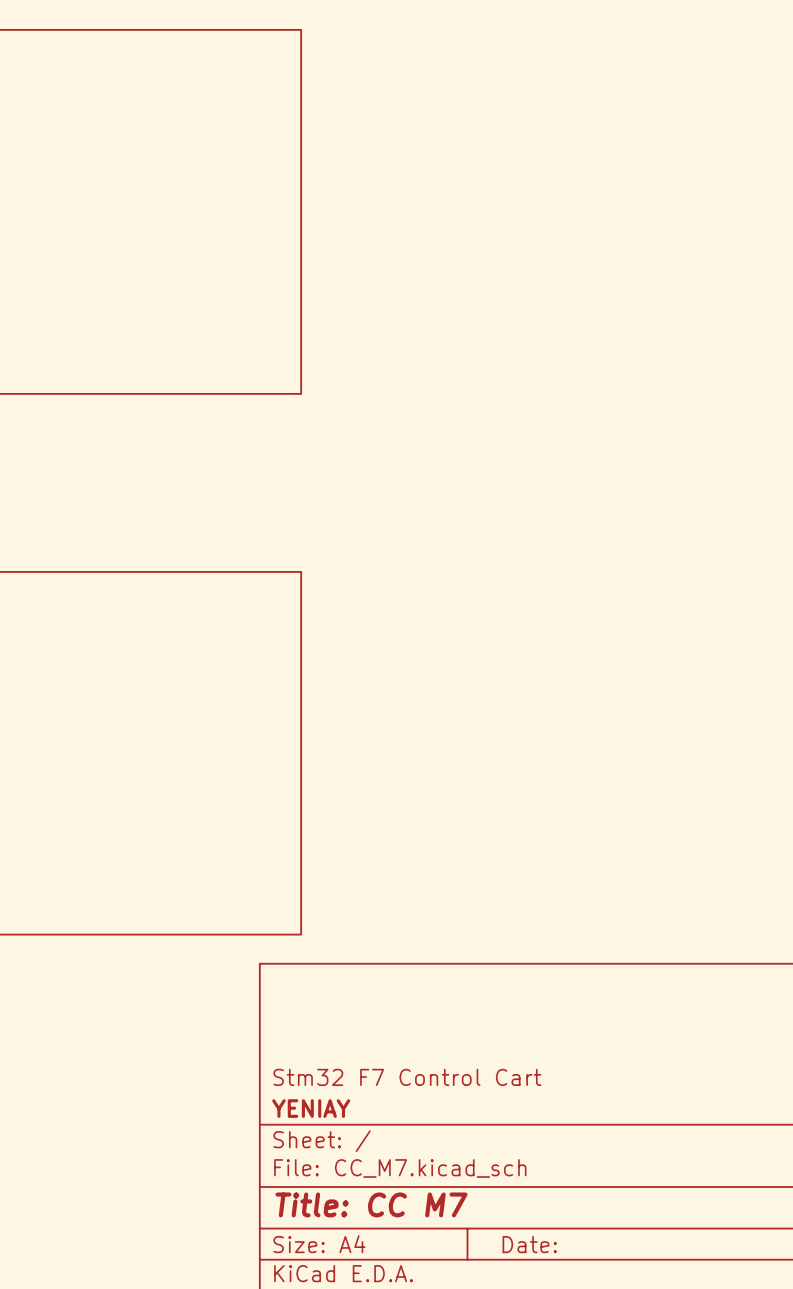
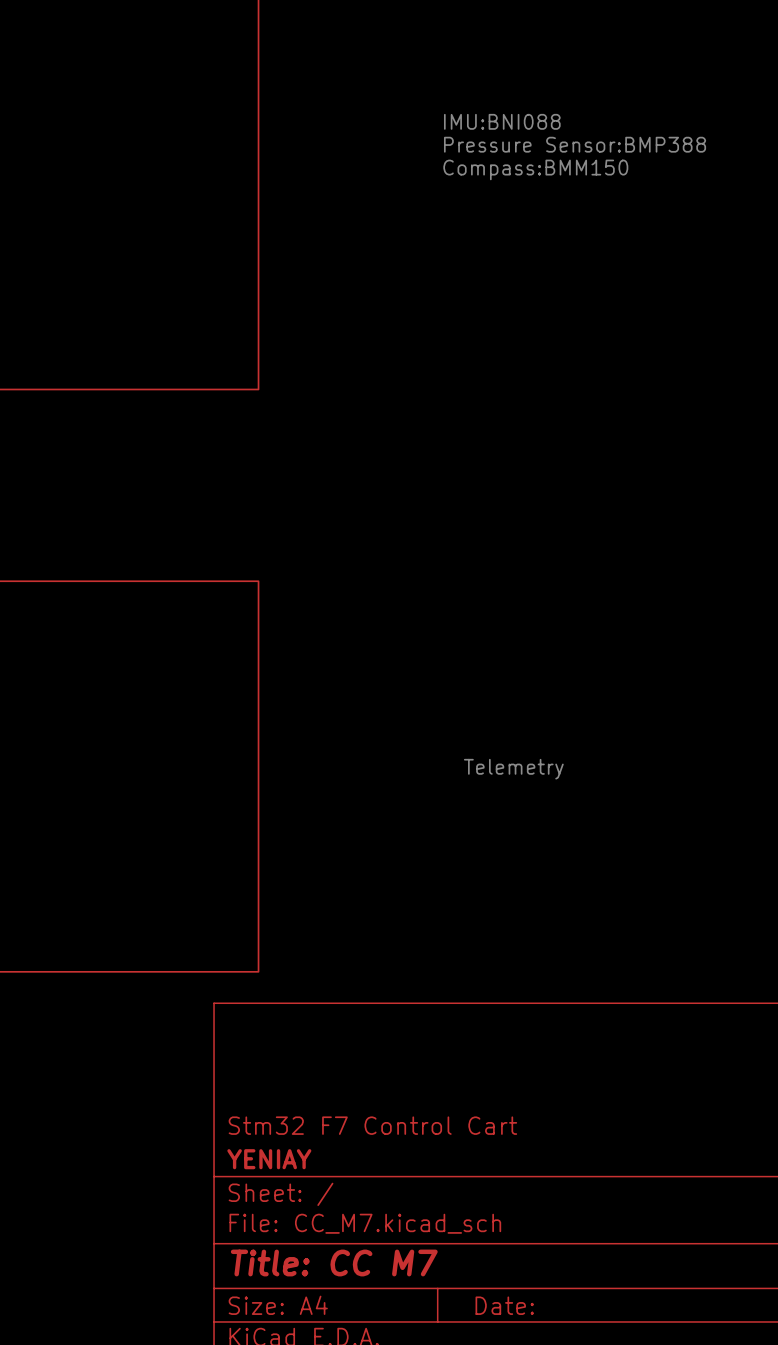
text: none -> IMU:BNI088 (502, 121)
text: none -> Pressure Sensor:BMP388 (575, 144)
text: none -> Compass:BMM150 (535, 169)
text: none -> Telemetry (513, 769)

